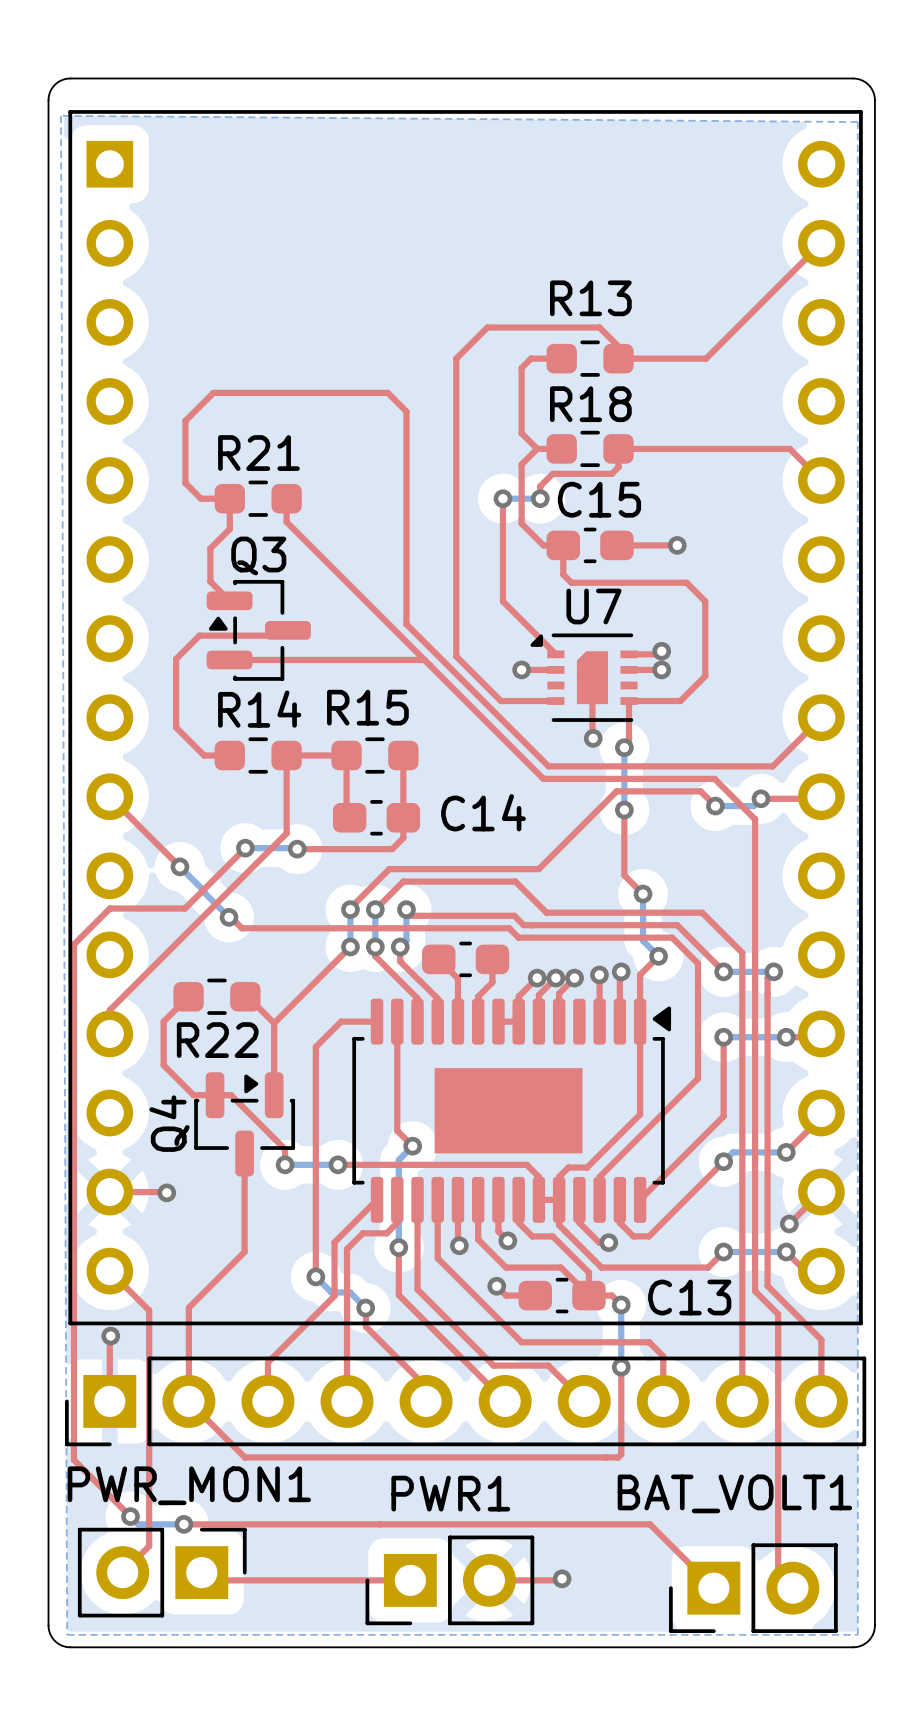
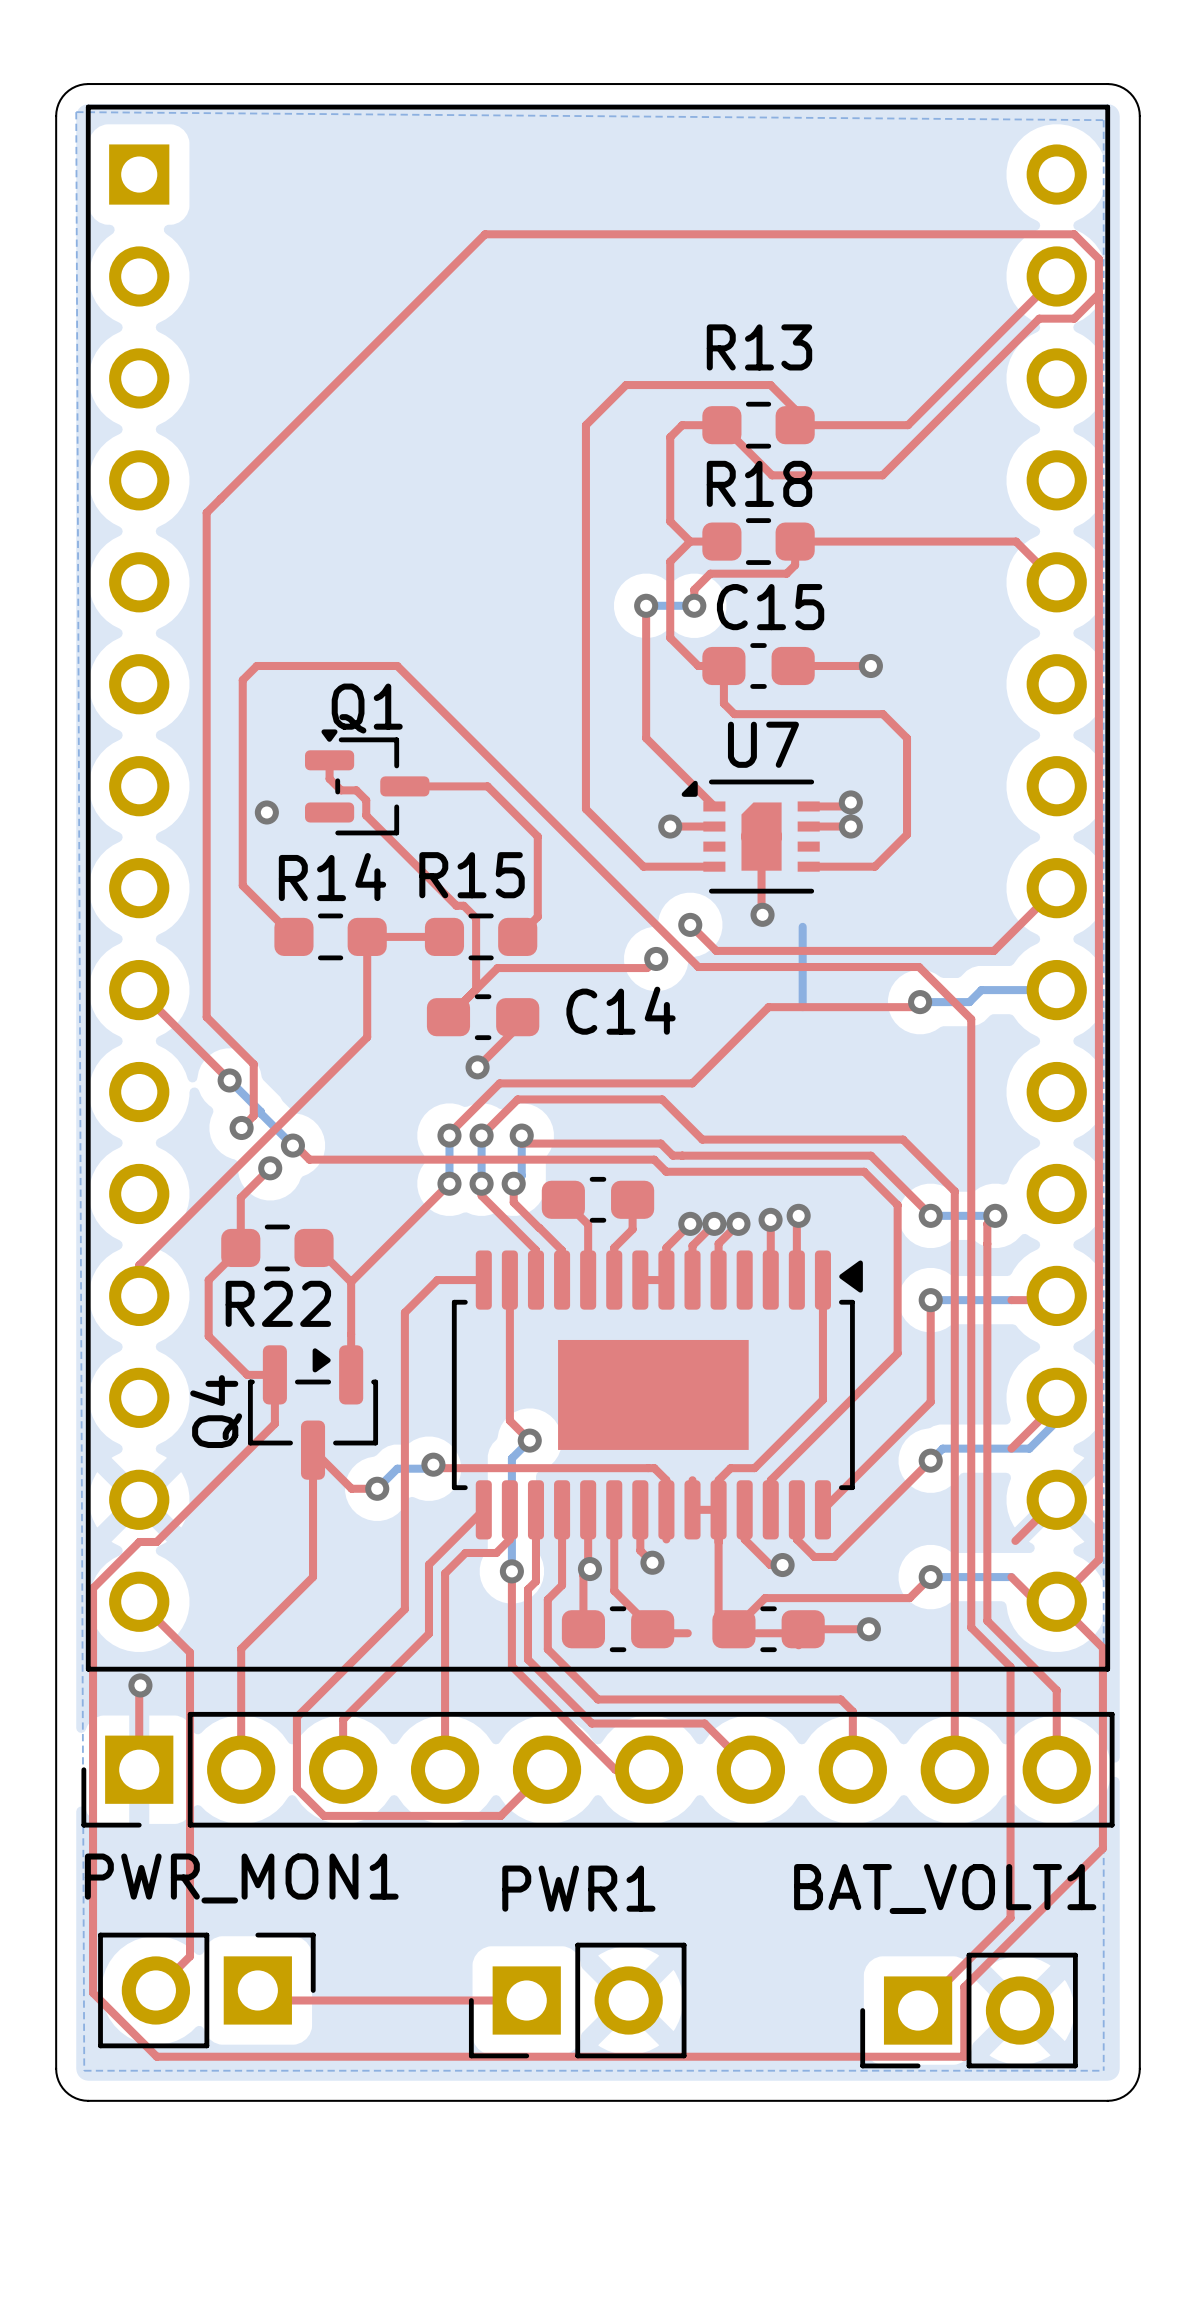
board edge: (70, 78) (853, 78) (864, 81) (872, 90) (874, 100) (874, 1625) (871, 1637) (862, 1645) (853, 1647) (70, 1647) (58, 1643) (50, 1634) (48, 1625) (48, 100) (50, 90) (54, 84) (60, 80) (70, 78) -> (88, 84) (75, 86) (65, 93) (58, 103) (56, 116) (56, 2068) (60, 2084) (72, 2096) (88, 2100) (1107, 2100) (1123, 2096) (1135, 2084) (1139, 2068) (1139, 116) (1135, 100) (1123, 88) (1107, 84) (88, 84)
top track: none -> (1098, 293) (1074, 318) (1039, 318) (882, 475) (772, 475) (721, 425)
R21: (258, 498) -> none
top track: (286, 498) (286, 522) (309, 545) -> none
top track: (229, 600) (210, 581) (210, 548) (229, 529) (229, 498) (201, 498) (185, 483) (185, 420) (213, 392) (387, 392) (406, 411) (406, 624) (548, 766) (557, 766) -> (690, 924) (716, 950)
top track: none -> (329, 760) (329, 778) (341, 790) (356, 790) (366, 800) (366, 815) (456, 905) (463, 905) (476, 918) (476, 989)
top track: (286, 629) (287, 630) (282, 635) (199, 635) (176, 659) (176, 727) (204, 755) (229, 755) -> (397, 665) (256, 665) (242, 680) (242, 885) (293, 936)
Q3: (258, 630) -> none
Q1: none -> (367, 782)
top track: none -> (404, 786) (487, 786) (537, 836) (537, 916) (529, 925)
via: none -> (266, 812)
top track: (229, 659) (424, 659) -> none
top track: (629, 701) (629, 746) (624, 747) -> none
via: none -> (690, 924)
via: (624, 747) -> none
top track: (346, 755) (346, 814) -> none
top track: (403, 755) (403, 817) -> none
top track: none -> (656, 958) (647, 968) (497, 968) (448, 1017)
via: none -> (656, 958)
bottom track: none -> (1056, 990) (981, 990) (978, 992)
top track: (760, 798) (819, 798) -> none
via: (760, 798) -> none
top track: (715, 806) (700, 791) (616, 791) (597, 809) -> (920, 1002) (915, 1007) (768, 1007)
top track: (624, 810) (624, 875) (643, 894) -> none
via: (624, 810) -> none
top track: (403, 825) (403, 838) (392, 849) (297, 849) -> (517, 1027) (477, 1067)
top track: (245, 848) (185, 908) (109, 908) (73, 944) (73, 1260) -> none
bottom track: (245, 848) (297, 849) -> none
via: (245, 848) -> none
via: (297, 849) -> none
via: none -> (477, 1067)
bottom track: (643, 894) (643, 940) (658, 956) -> none
via: (643, 894) -> none
via: none -> (241, 1127)
top track: none -> (270, 1168) (240, 1197) (240, 1247)
via: none -> (270, 1168)
top track: (658, 956) (640, 974) (640, 1021) -> none
via: (658, 956) -> none
via: (786, 1037) -> none
top track: (215, 1095) (230, 1095) (285, 1149) (285, 1164) -> (274, 1374) (274, 1423) (156, 1541) (139, 1541) (93, 1588)
bottom track: none -> (1056, 1397) (1056, 1421) (1029, 1448) (1011, 1448)
via: (786, 1152) -> none
top track: none -> (313, 1450) (351, 1488) (377, 1488)
bottom track: (285, 1164) (337, 1164) -> none
via position: (285, 1164) -> (377, 1488)
top track: (337, 1164) (526, 1164) (538, 1176) -> none
top track: none -> (429, 1468) (654, 1468) (666, 1480) (666, 1509)
bottom track: none -> (428, 1468) (397, 1468) (377, 1488)
top track: (109, 1192) (166, 1192) -> none
via: (166, 1192) -> none
top track: (518, 1222) (532, 1236) (552, 1236) (588, 1272) (588, 1295) (560, 1267) (506, 1267) (478, 1239) -> (652, 1629) (614, 1590) (614, 1561)
via: (789, 1223) -> none
top track: (559, 1225) (601, 1267) (708, 1267) -> (718, 1542) (718, 1613) (733, 1629) (765, 1598) (910, 1597)
top track: none -> (589, 1569) (583, 1575) (583, 1629)
via: (786, 1251) -> none
top track: (417, 1255) (417, 1289) (493, 1365) -> (535, 1581) (527, 1589) (527, 1659) (591, 1723) (634, 1723)
top track: (437, 1258) (521, 1342) (649, 1342) (653, 1346) -> (562, 1585) (547, 1599) (547, 1649) (597, 1699) (840, 1699)
bottom track: (315, 1275) (331, 1292) (350, 1292) (365, 1308) -> none
top track: none -> (404, 1609) (296, 1717) (296, 1788) (323, 1815) (500, 1815) (547, 1769)
via: (315, 1276) -> none
via: (496, 1286) -> none
part: none -> (618, 1629)
part: none -> (768, 1629)
top track: none -> (803, 1629) (868, 1629)
via: none -> (868, 1629)
top track: (398, 1295) (505, 1401) -> (511, 1632) (511, 1666) (615, 1769) (648, 1769)
C13: (562, 1295) -> none
bottom track: (621, 1304) (621, 1367) -> none
via: (621, 1304) -> none
via: (365, 1308) -> none
top track: (366, 1308) (366, 1326) (425, 1385) -> none
top track: (778, 1314) (778, 1573) -> (1000, 1657) (1010, 1666) (1010, 1918) (918, 2010)
top track: (621, 1367) (621, 1454) (618, 1457) (244, 1457) (188, 1401) -> none
via: (621, 1367) -> none
top track: (73, 1460) (130, 1516) -> (93, 1845) (93, 1992) (156, 2056) (964, 2056) (964, 1987) (1102, 1848) (1102, 1647) (1056, 1601) (1098, 1559) (1098, 259) (1074, 234) (485, 234) (206, 512) (206, 1017) (253, 1064) (253, 1115) (241, 1127)
bottom track: (130, 1516) (138, 1524) (183, 1524) -> none
via: (130, 1516) -> none
top track: (183, 1524) (650, 1524) (713, 1588) -> none
via: (183, 1524) -> none
top track: (562, 1578) (560, 1580) (489, 1580) -> none
via: (562, 1578) -> none

